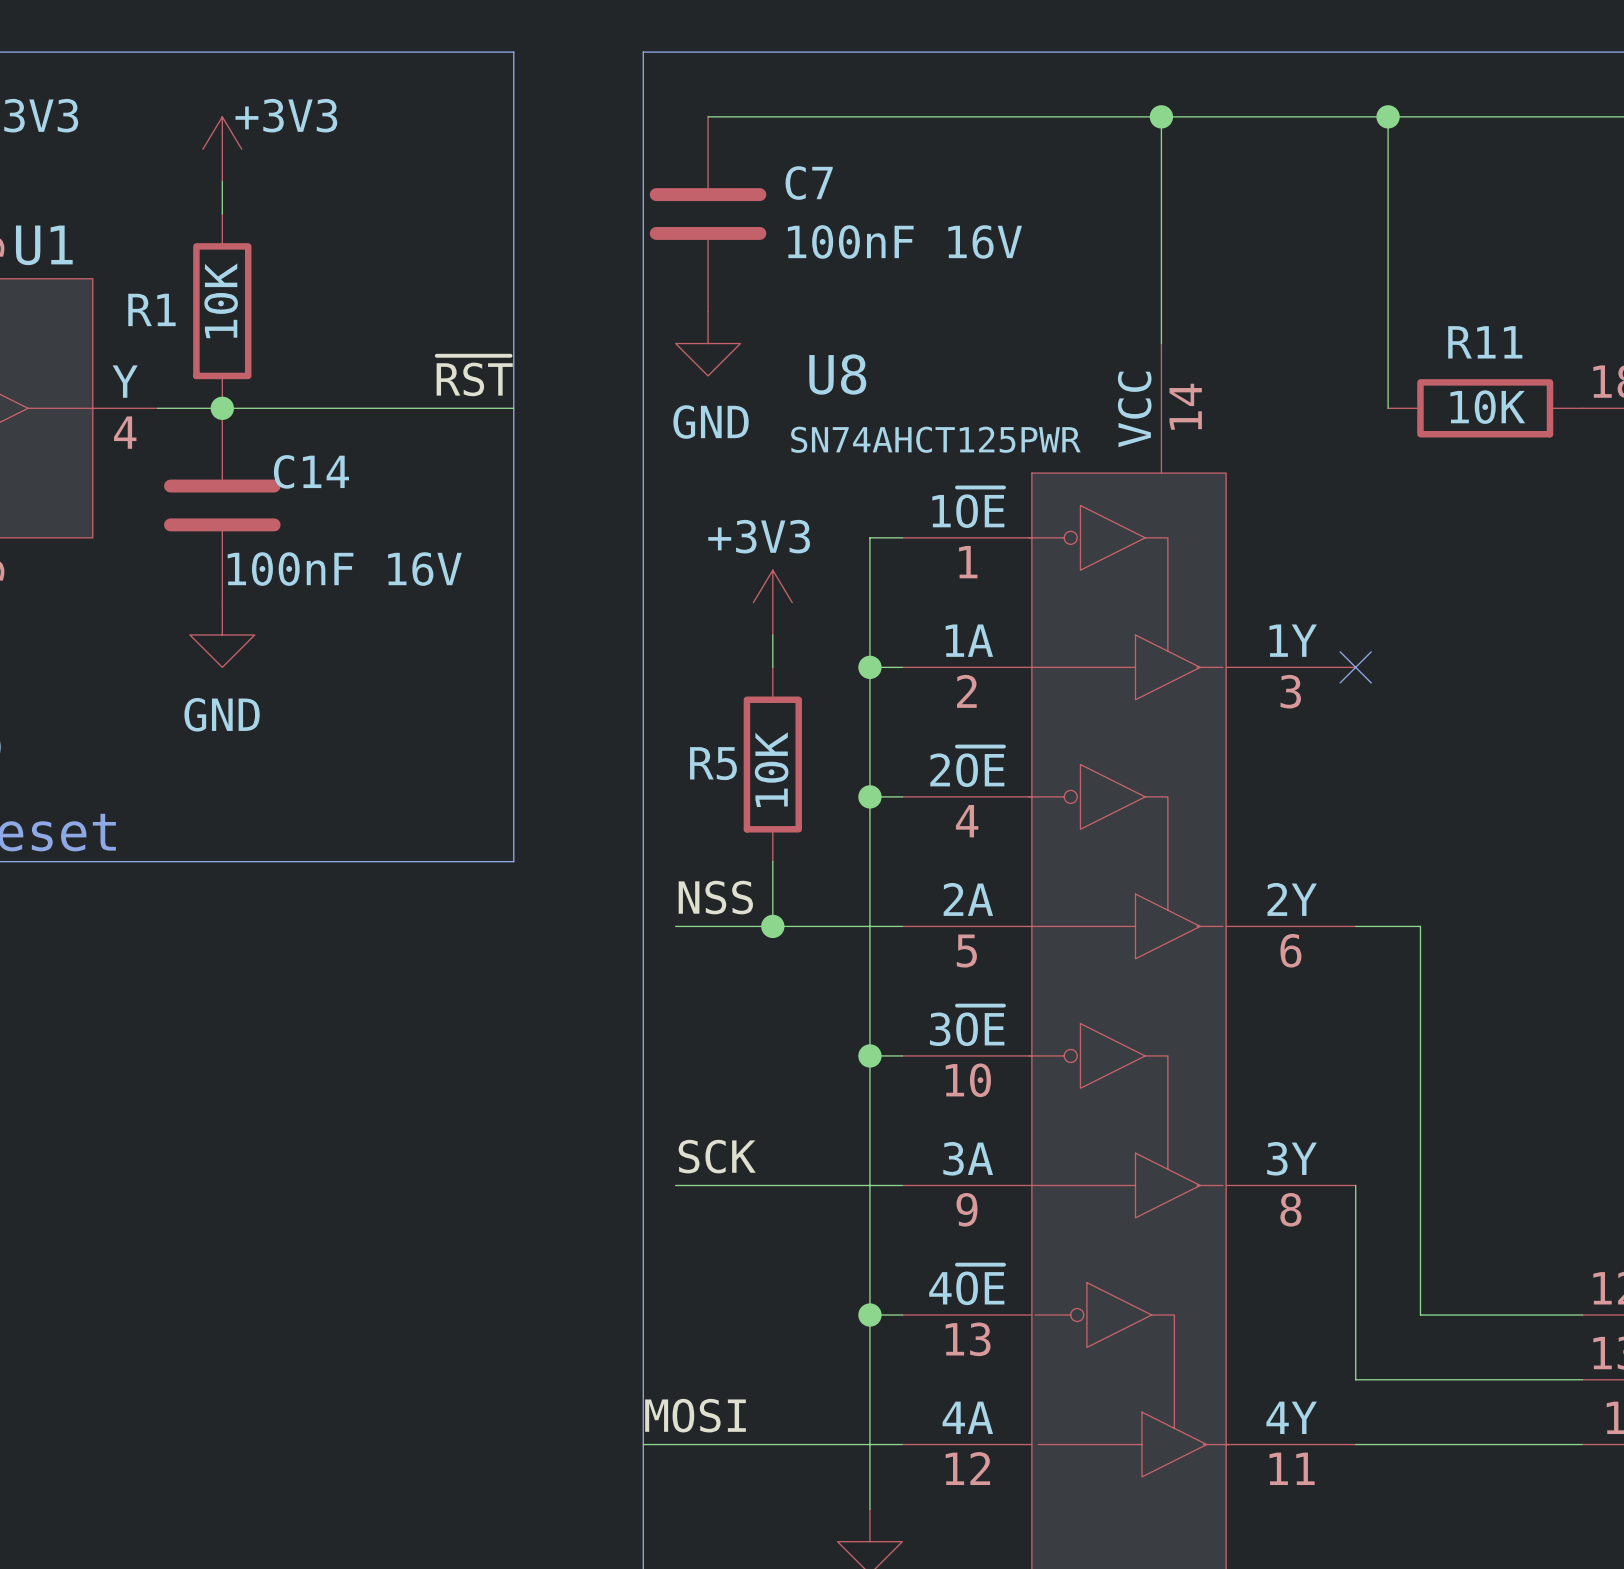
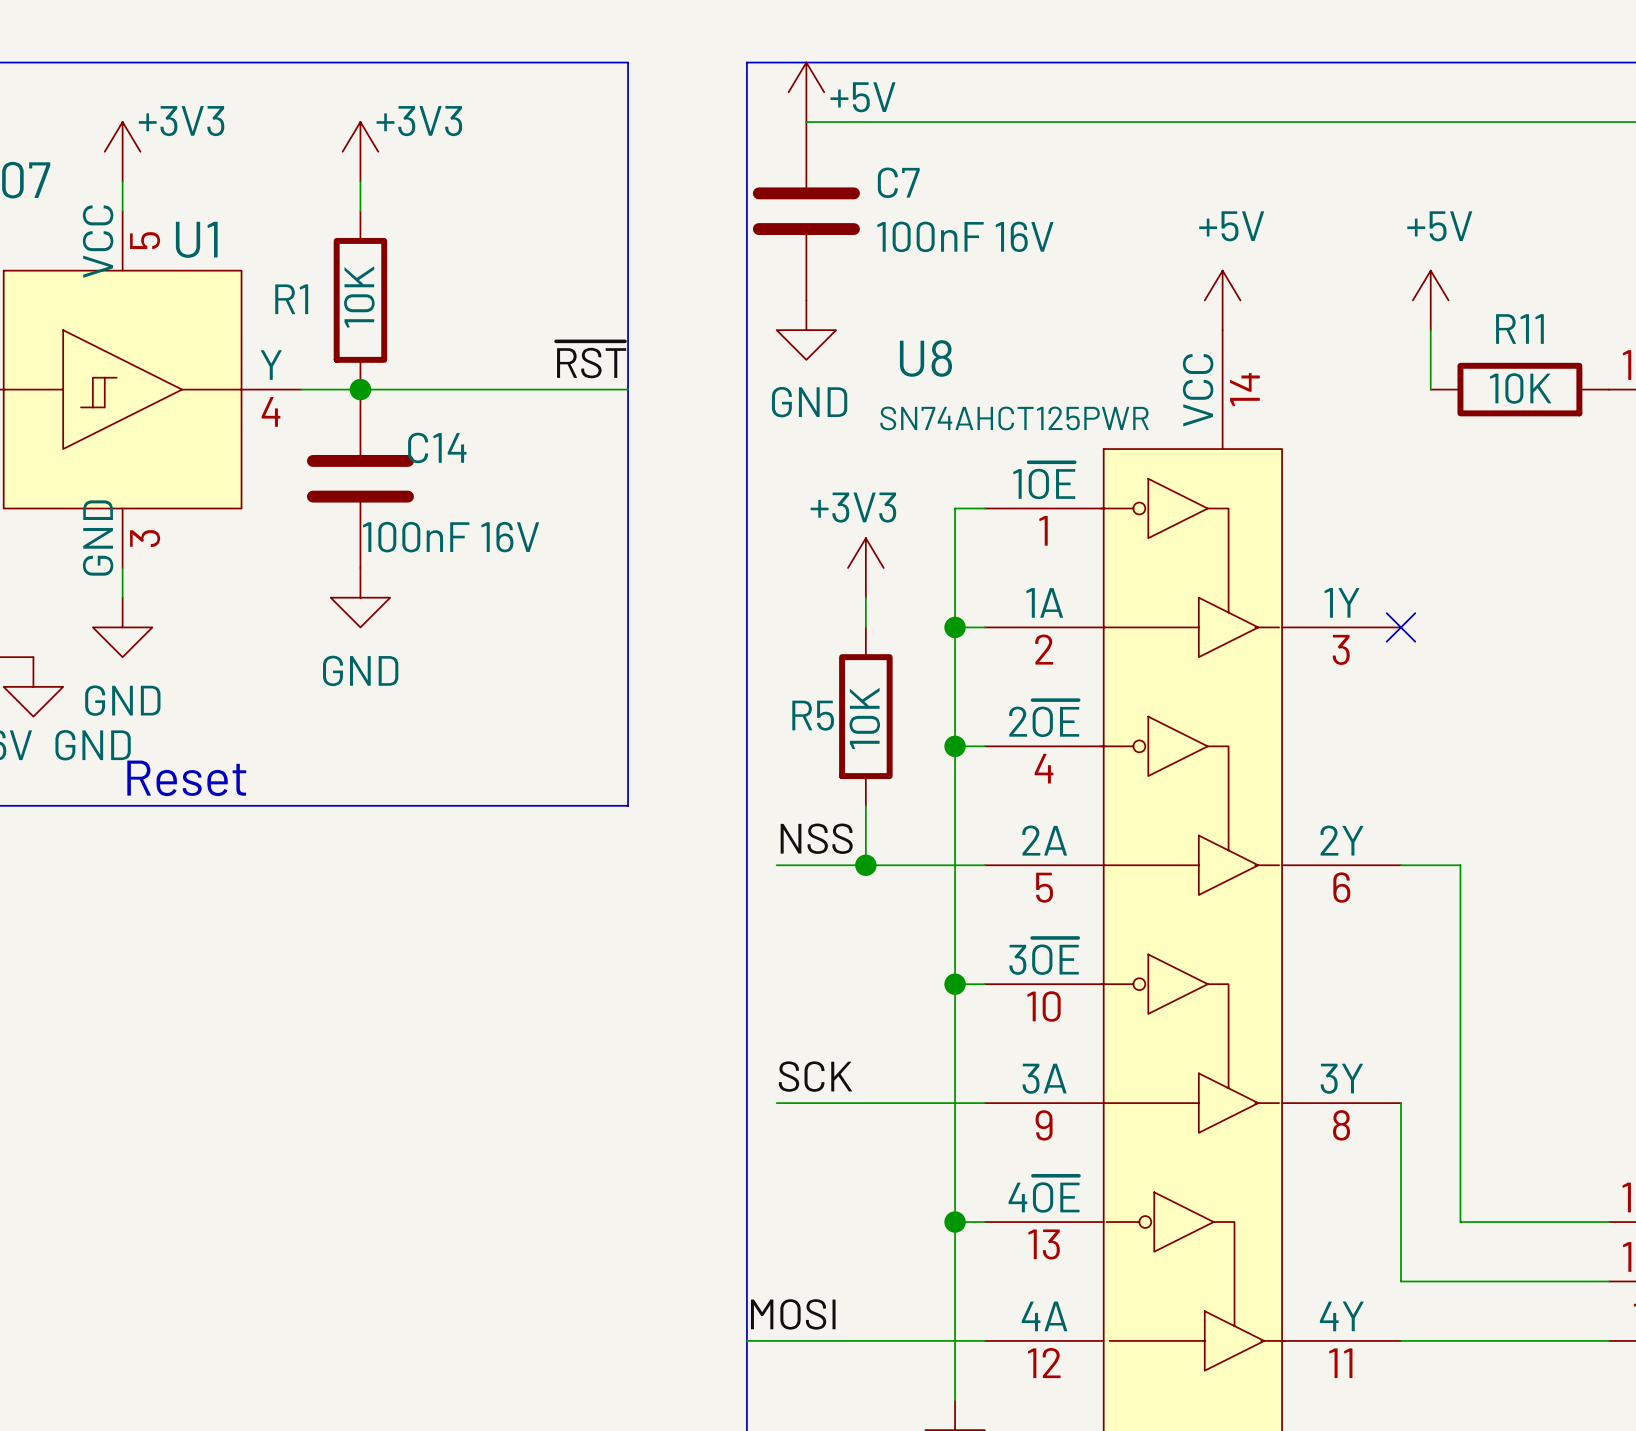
power symbol: none -> +5V (806, 92)
wire: (1161, 116) (1161, 343) -> none
junction: (1161, 116) -> none
wire: (1388, 116) (1388, 343) -> none
junction: (1388, 116) -> none
power symbol: none -> +5V (1222, 300)
power symbol: none -> +5V (1430, 300)

